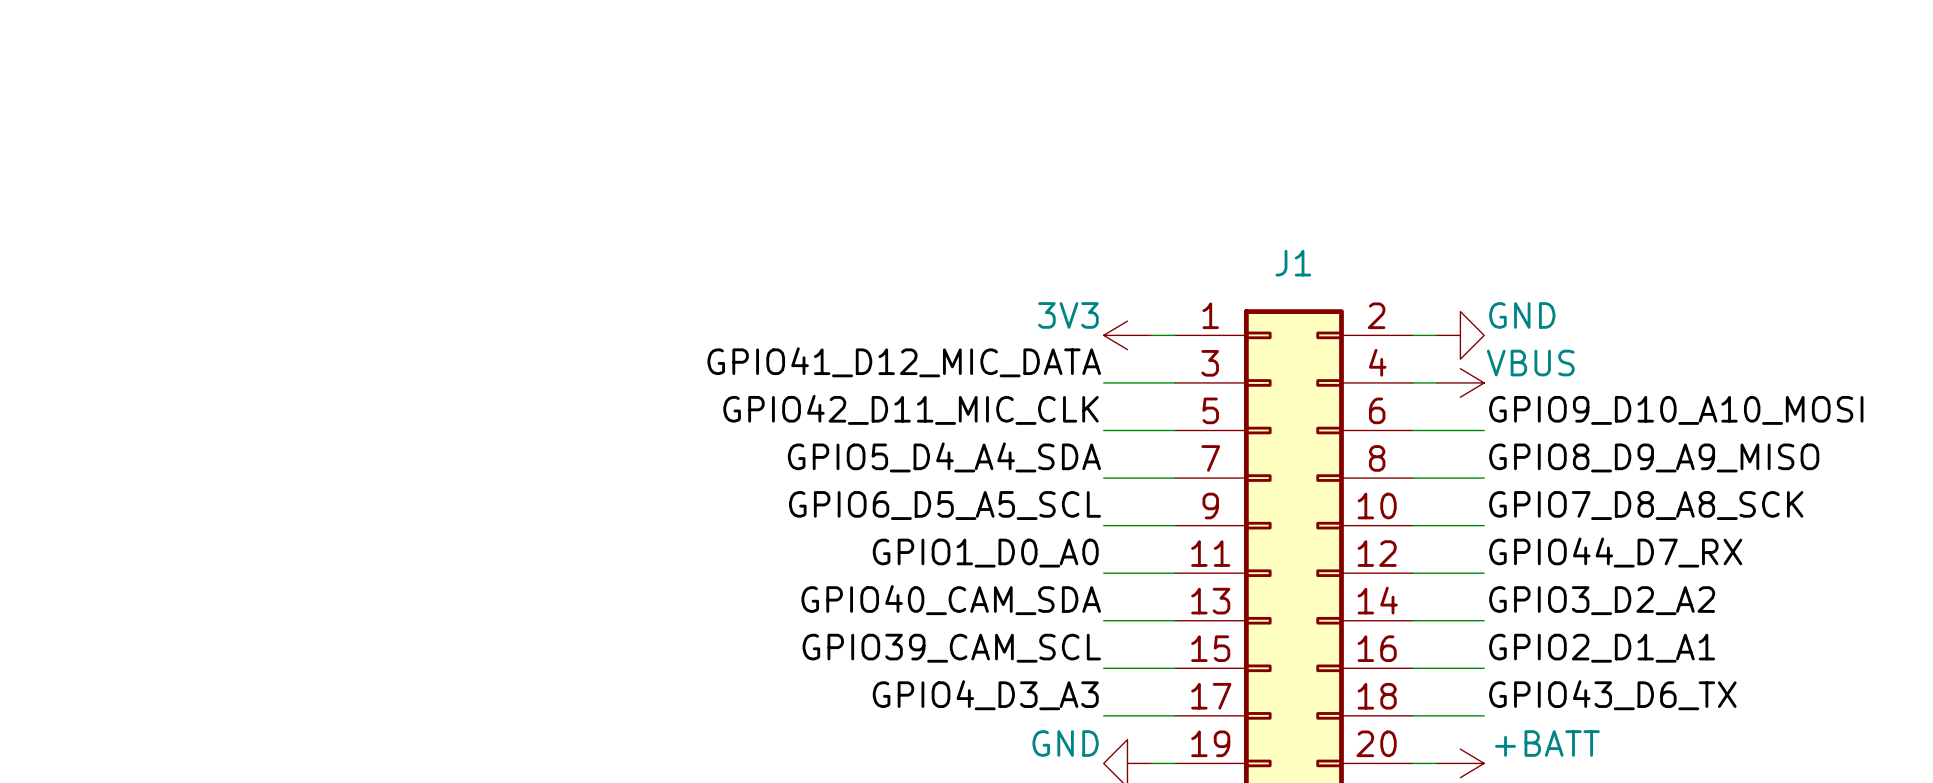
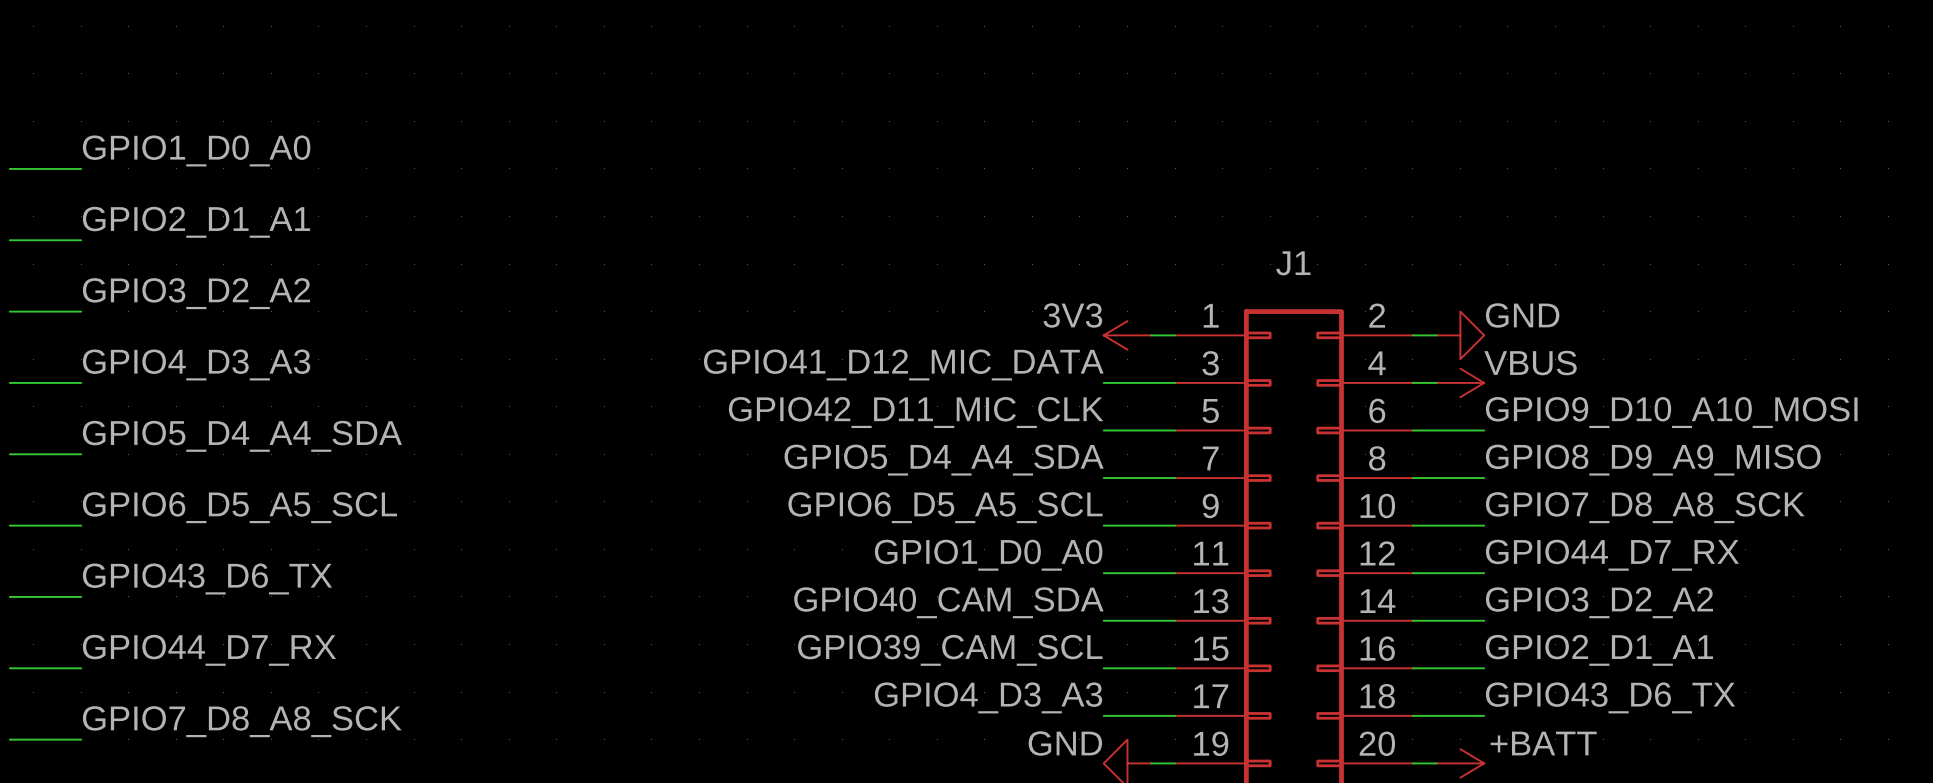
label: none -> GPIO1_D0_A0 (196, 150)
wire: none -> (9, 168) (81, 168)
label: none -> GPIO2_D1_A1 (196, 222)
wire: none -> (9, 240) (81, 240)
label: none -> GPIO3_D2_A2 (196, 293)
wire: none -> (9, 311) (81, 311)
label: none -> GPIO4_D3_A3 (196, 364)
wire: none -> (9, 382) (81, 382)
label: none -> GPIO5_D4_A4_SDA (242, 436)
wire: none -> (9, 454) (81, 454)
label: none -> GPIO6_D5_A5_SCL (239, 507)
wire: none -> (9, 525) (81, 525)
label: none -> GPIO43_D6_TX (207, 579)
wire: none -> (9, 596) (81, 596)
label: none -> GPIO44_D7_RX (209, 650)
wire: none -> (9, 668) (81, 668)
label: none -> GPIO7_D8_A8_SCK (242, 721)
wire: none -> (9, 739) (81, 739)

